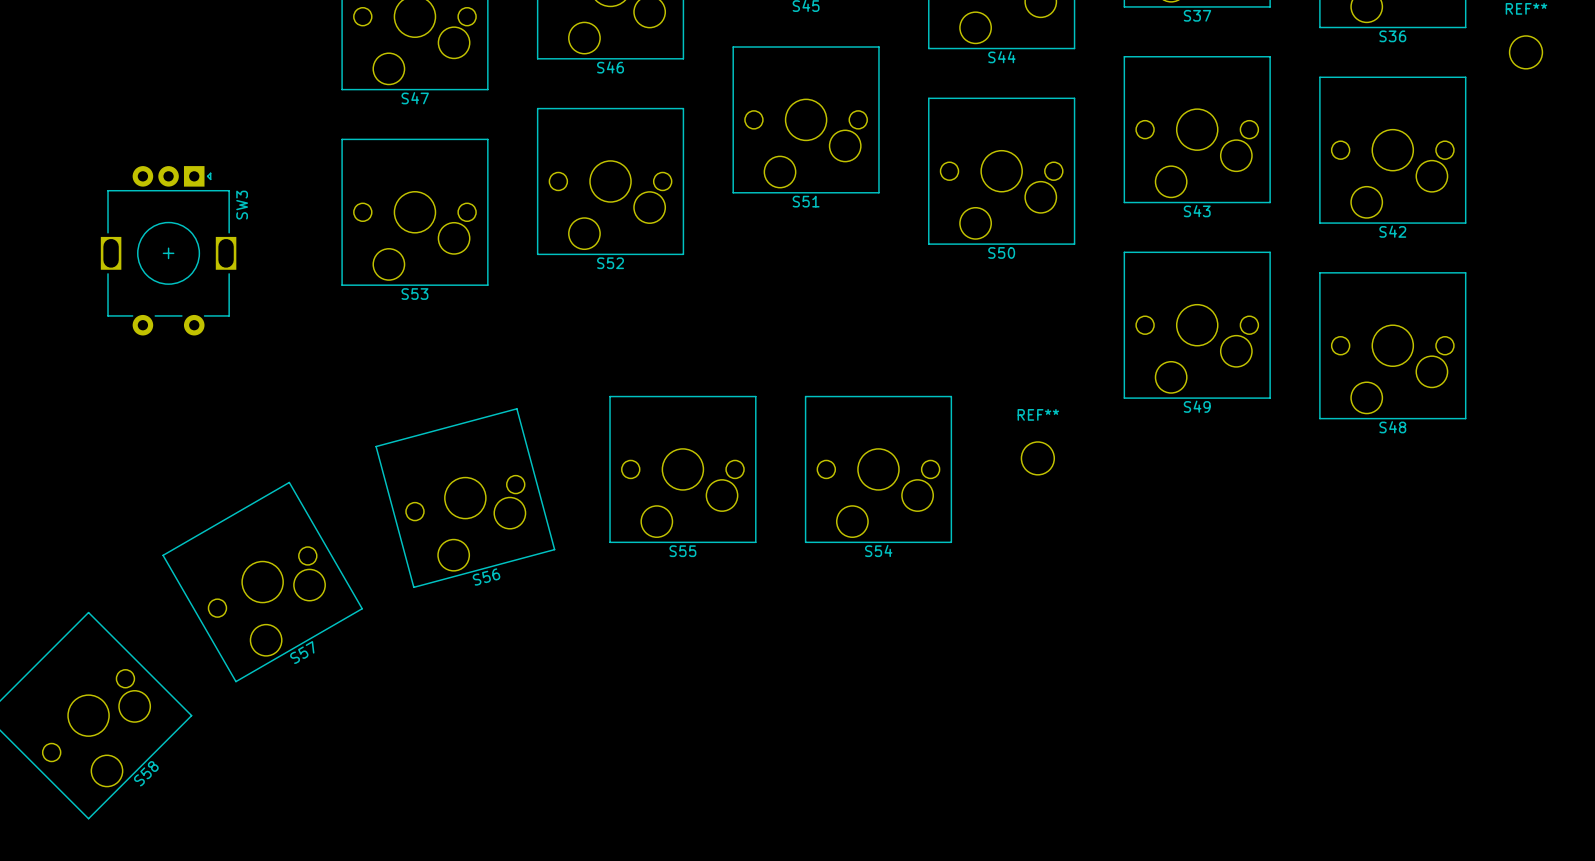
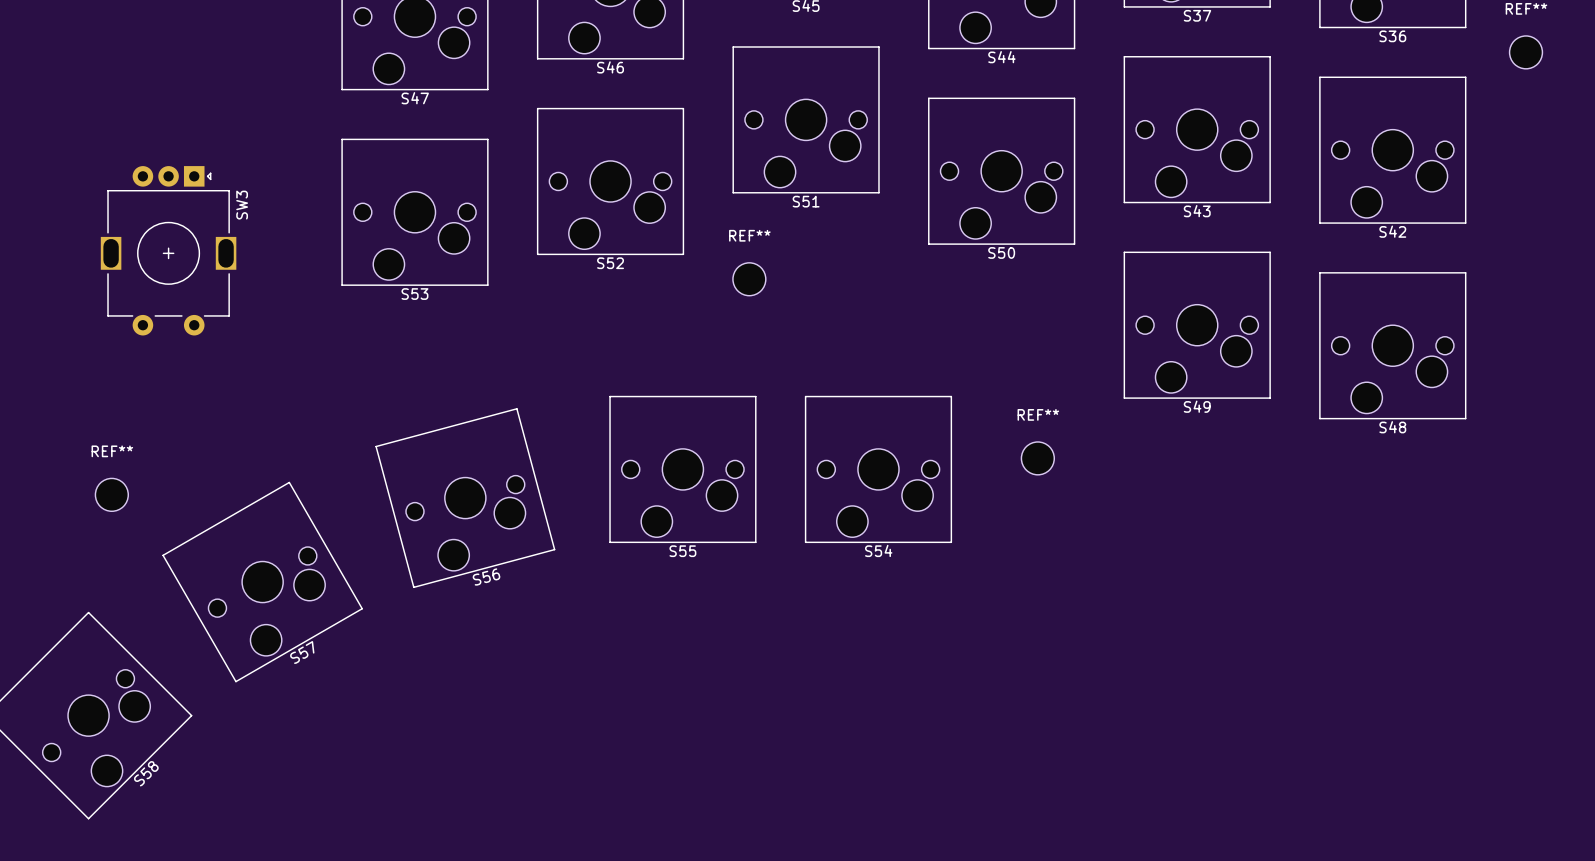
REF**: none -> (749, 279)
REF**: none -> (111, 494)

